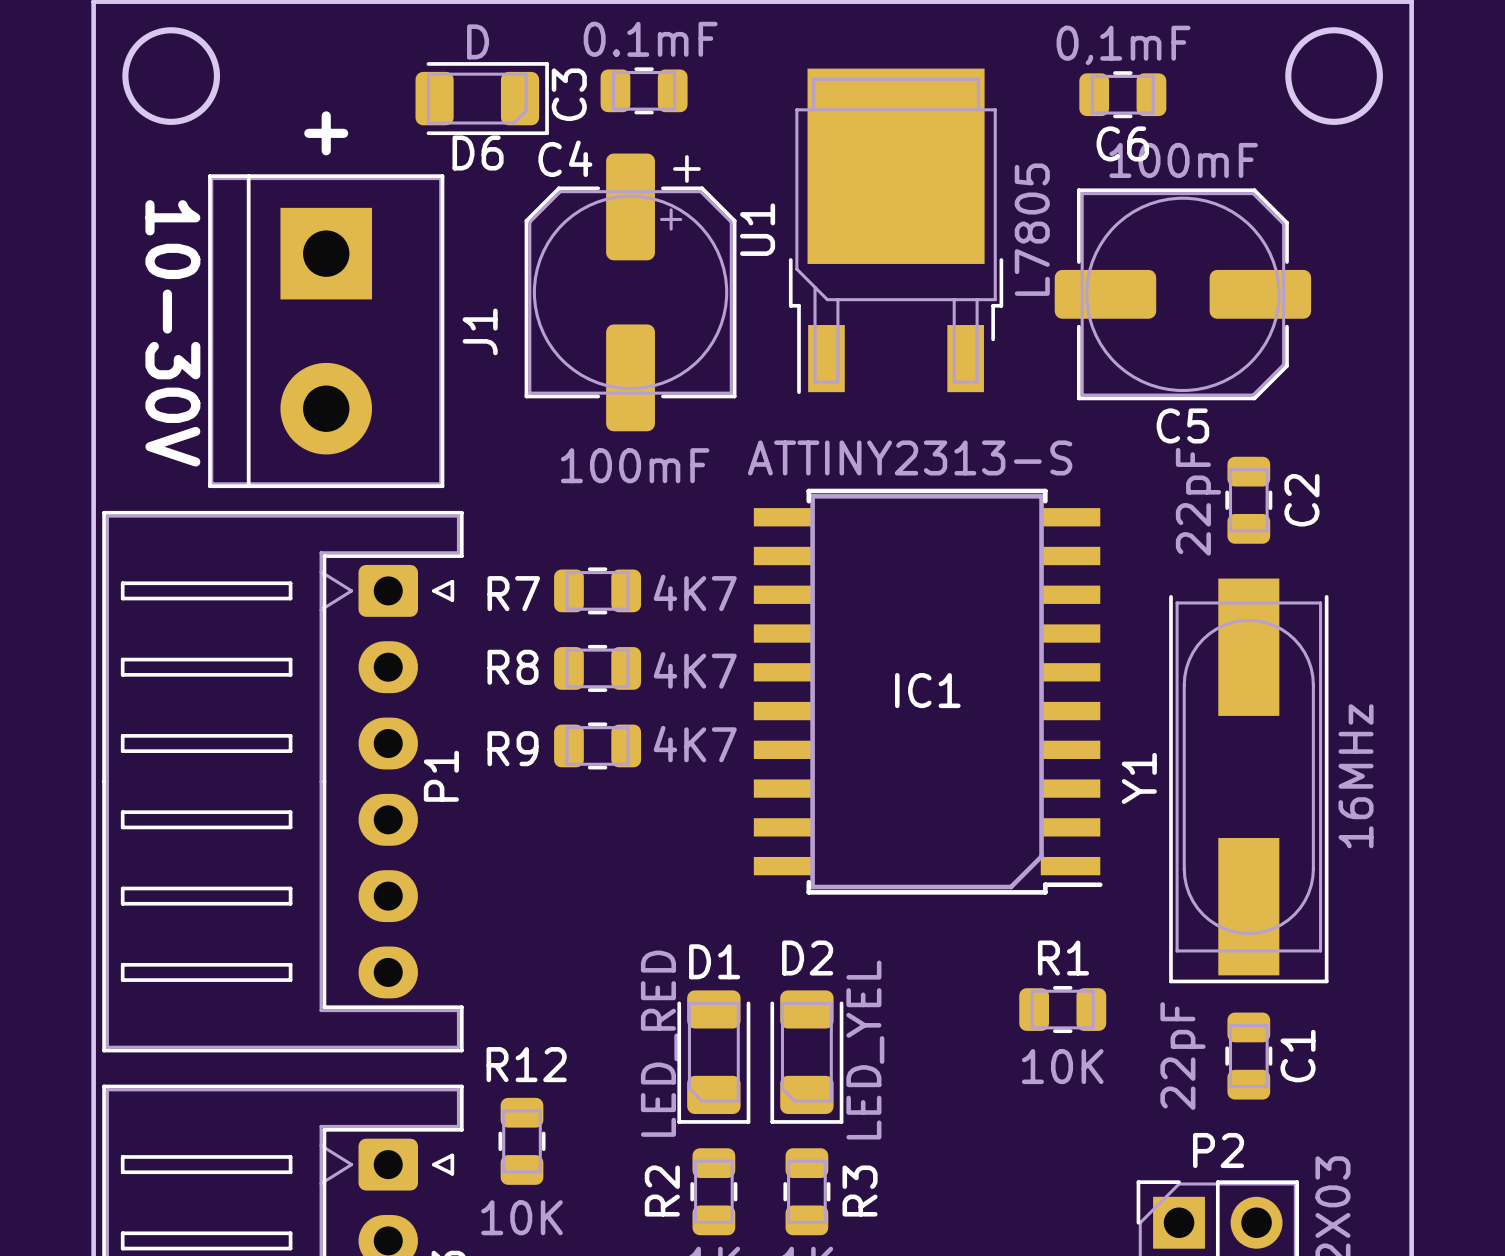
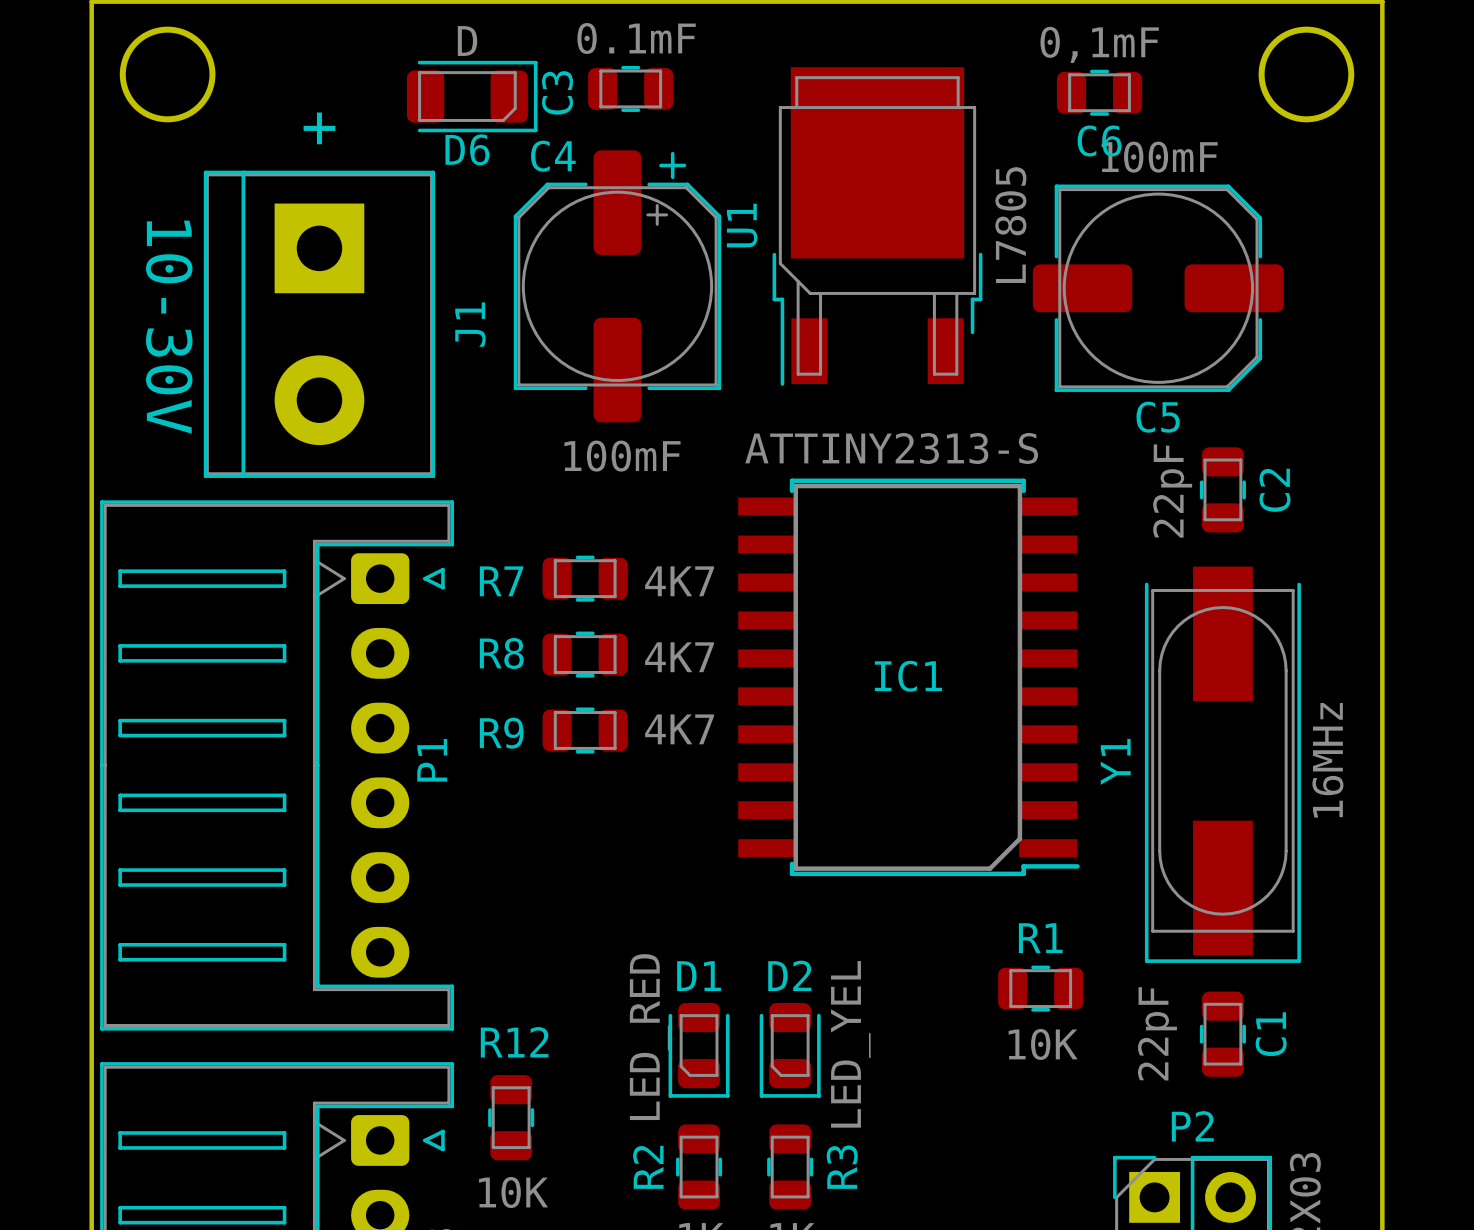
D1 footprint: [677, 990, 751, 1124] -> [668, 1002, 730, 1098]
D2 footprint: [770, 990, 844, 1124] -> [759, 1002, 821, 1098]

